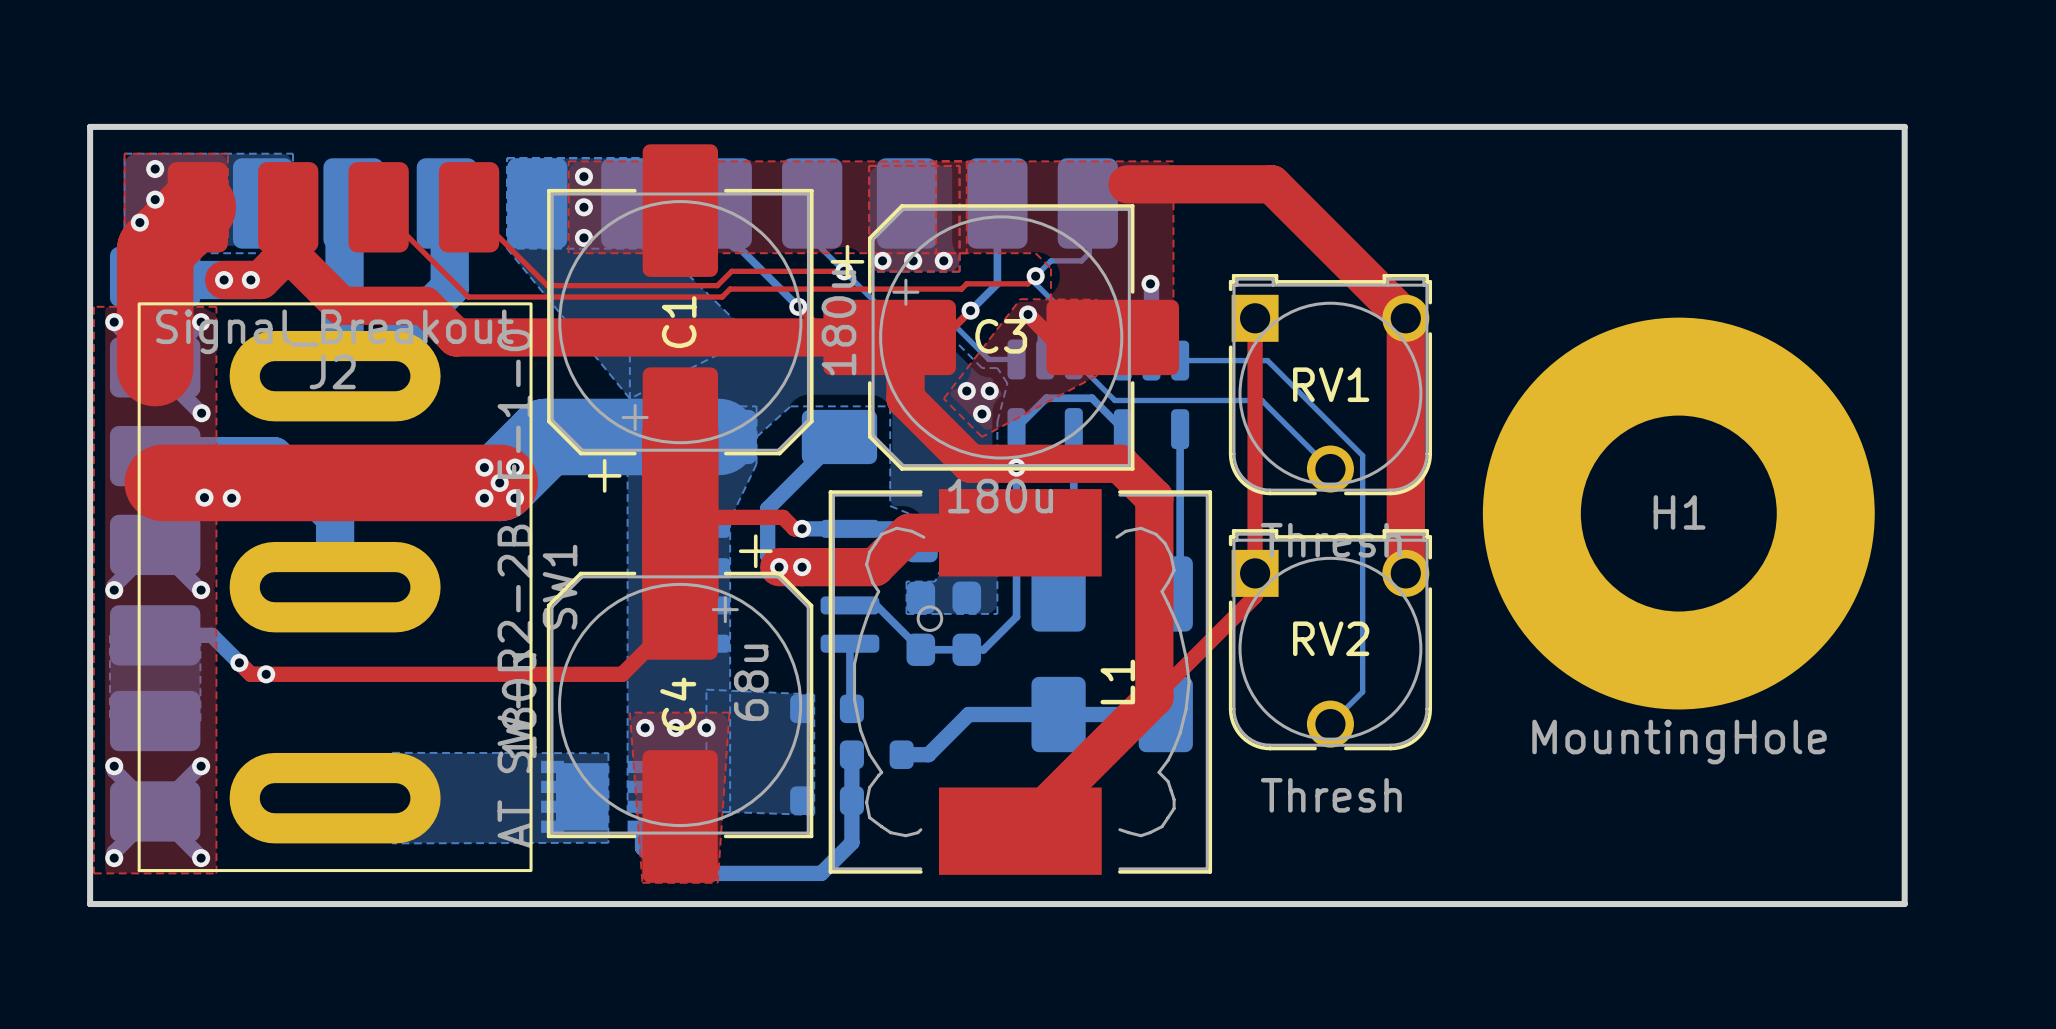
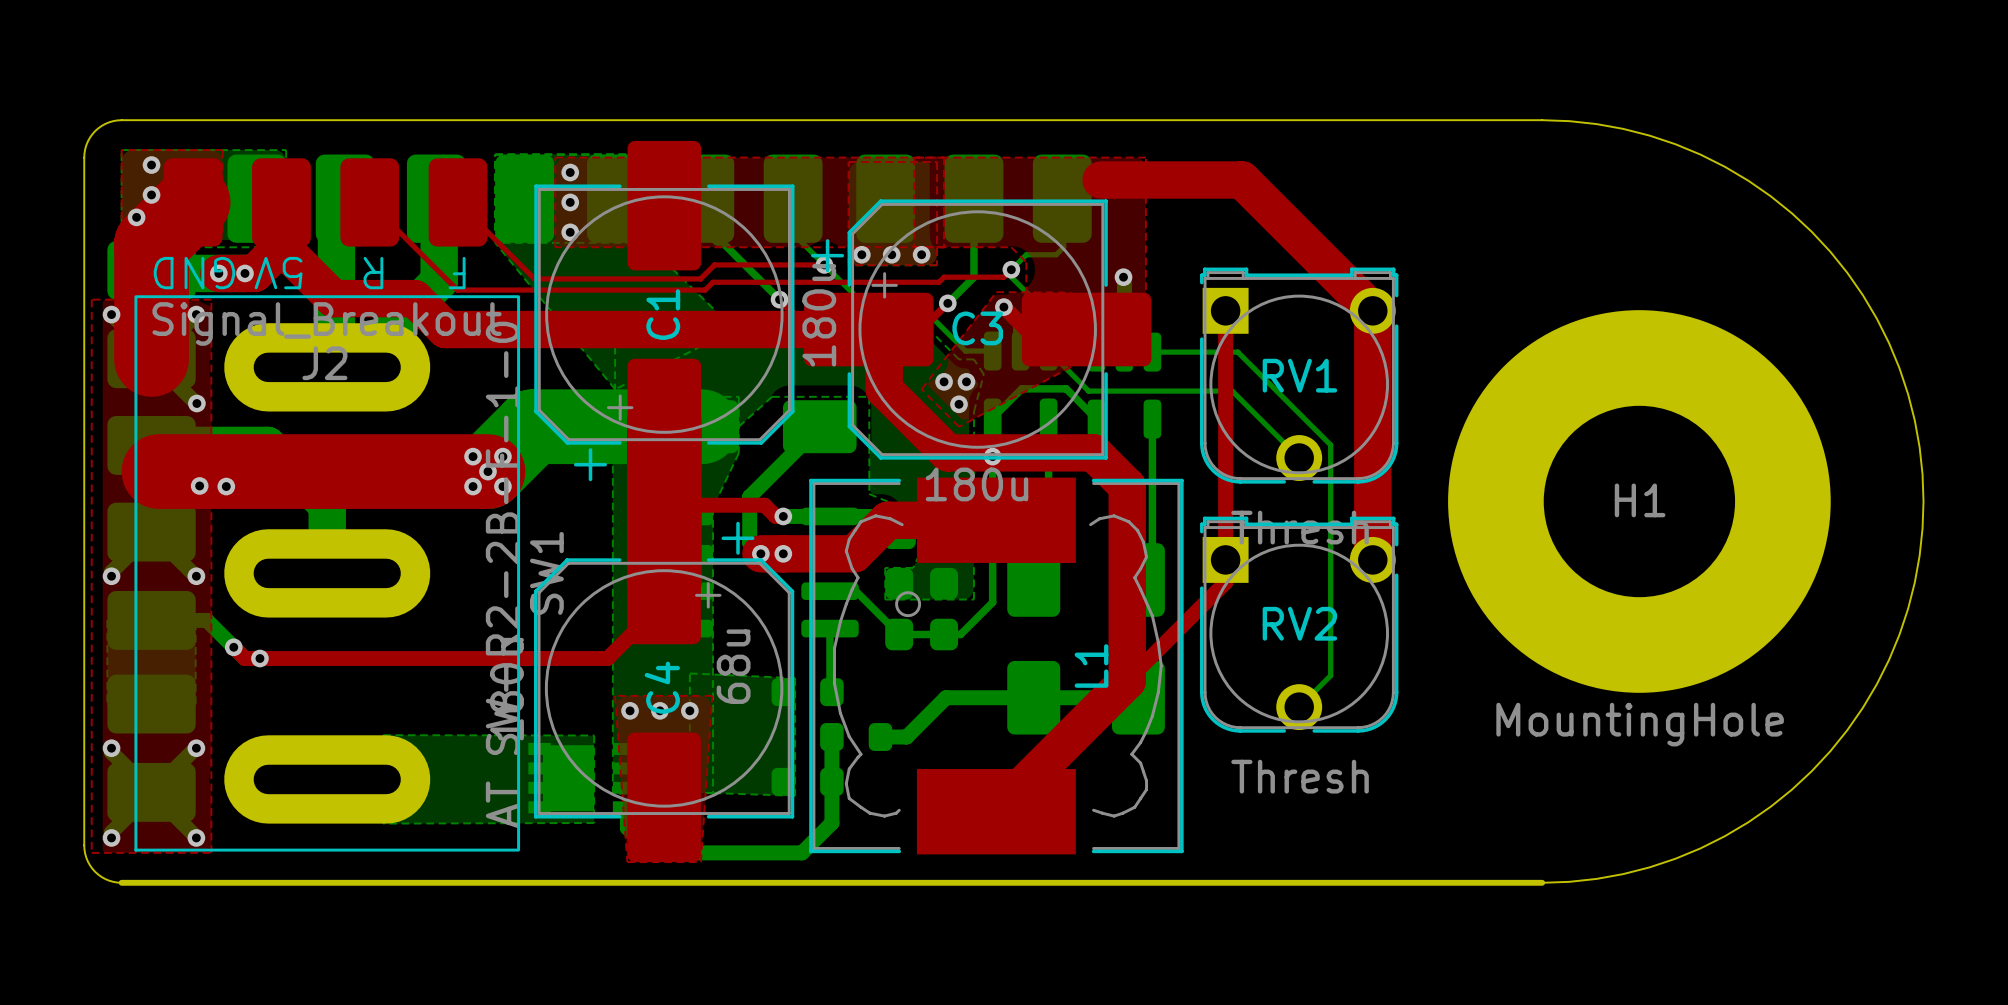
text: none -> GND (194, 273)
text: none -> 5V (278, 273)
text: none -> R (373, 273)
text: none -> F (457, 273)
board edge: (124, 904) (90, 904) (90, 126) (1904, 126) (1904, 904) (1579, 904) -> (121, 882) (109, 880) (95, 871) (87, 861) (84, 845) (84, 157) (86, 145) (95, 131) (109, 122) (121, 120) (1542, 120) (1596, 124) (1649, 135) (1700, 154) (1724, 166) (1770, 196) (1811, 231) (1830, 251) (1862, 295) (1889, 343) (1908, 394) (1914, 420) (1922, 474) (1922, 528) (1914, 582) (1908, 608) (1889, 659) (1862, 707) (1847, 730) (1811, 771) (1770, 806) (1724, 836) (1675, 858) (1623, 874) (1596, 878) (1542, 882)

